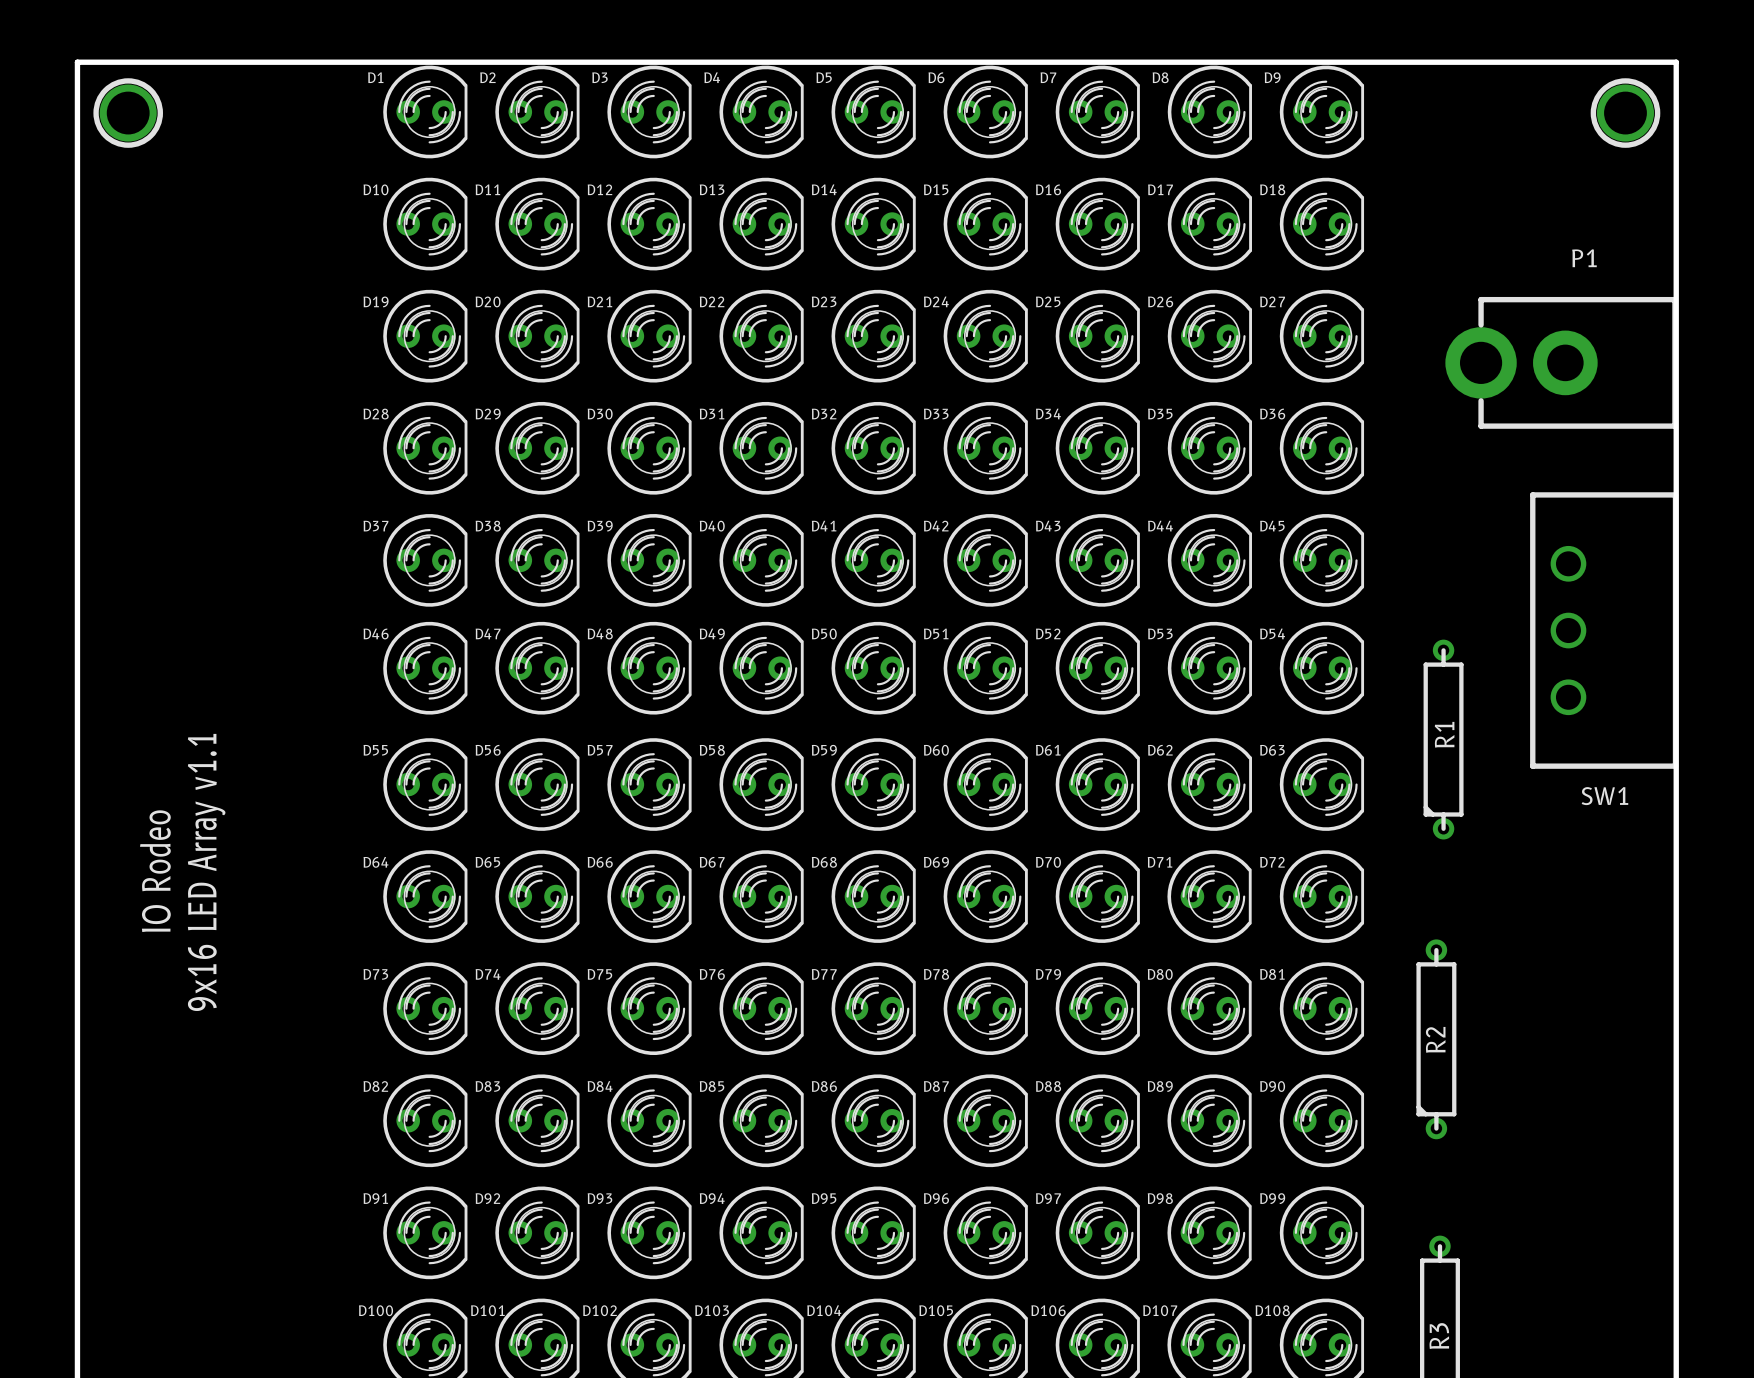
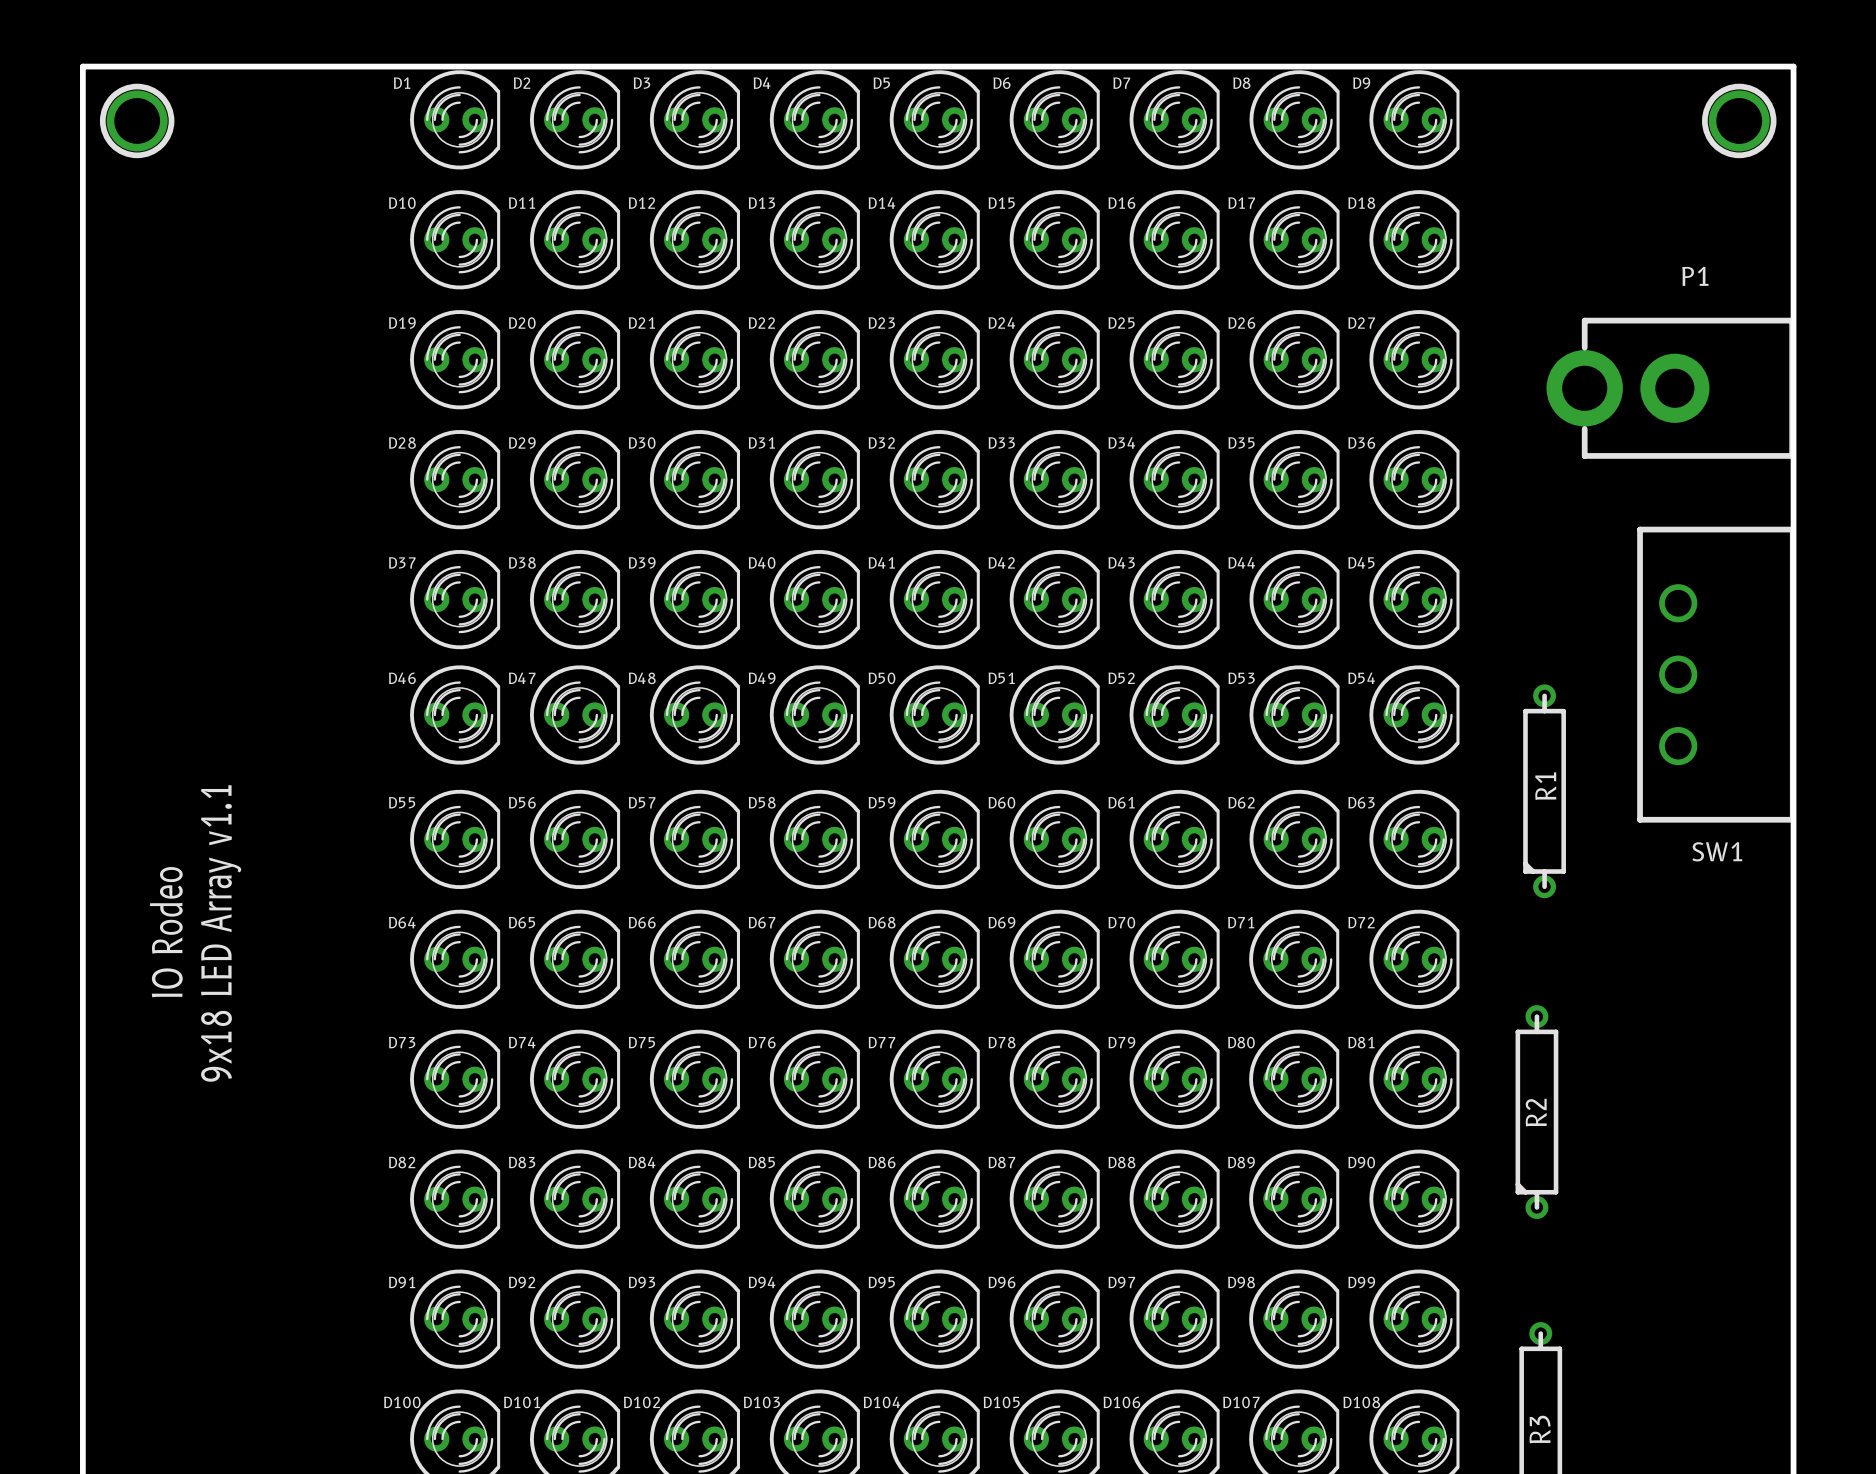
text: 9x16 LED Array v1.1 (206, 872) -> 9x18 LED Array v1.1 (221, 933)

